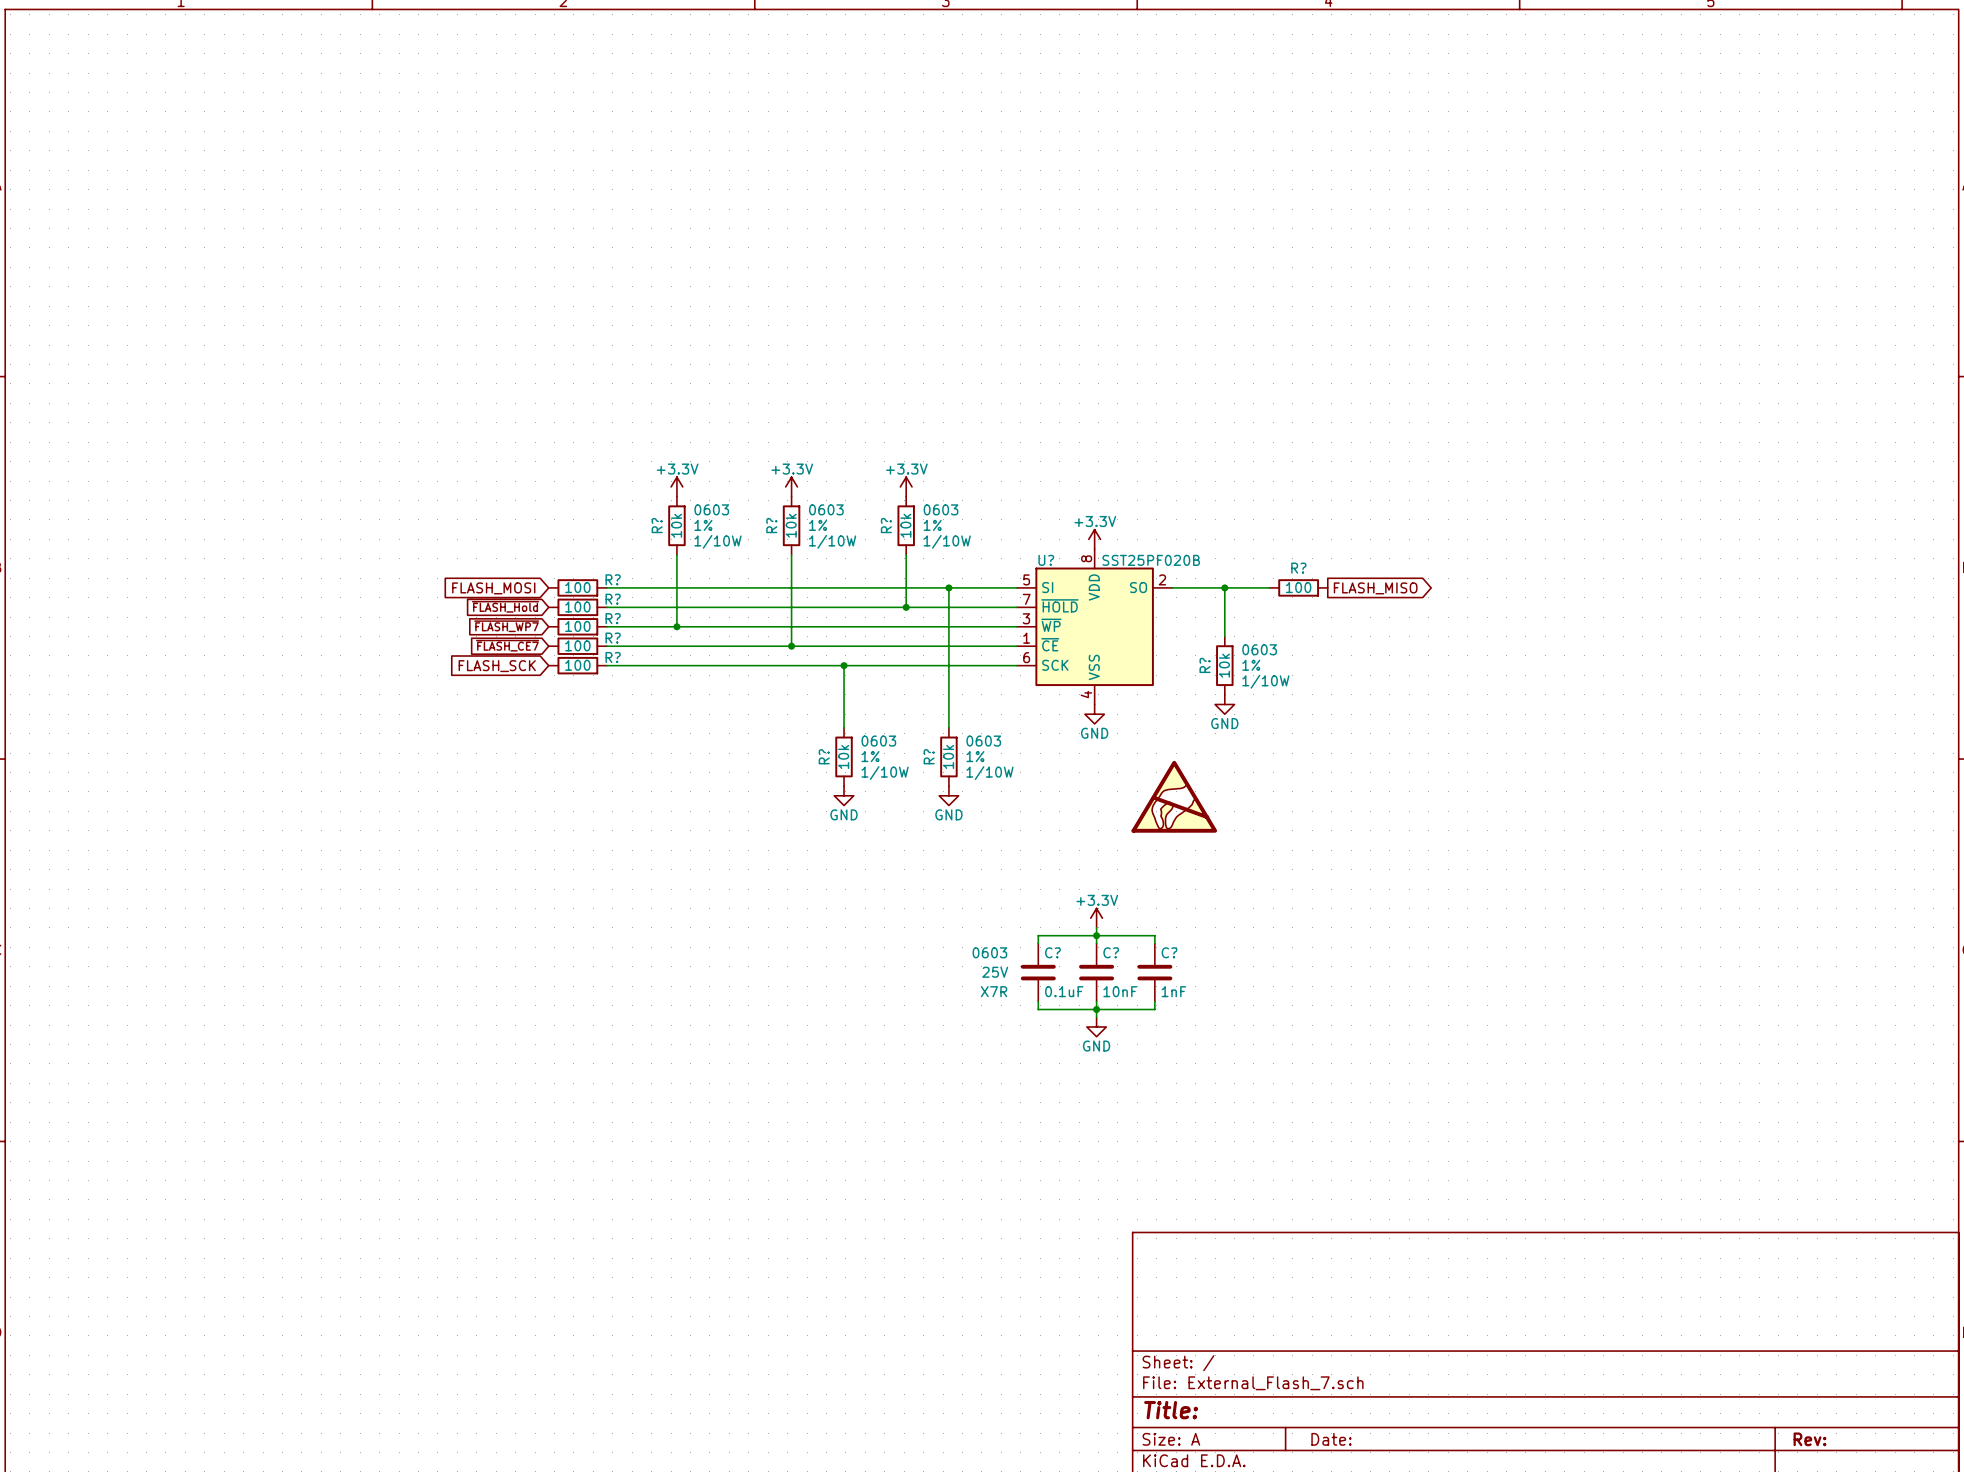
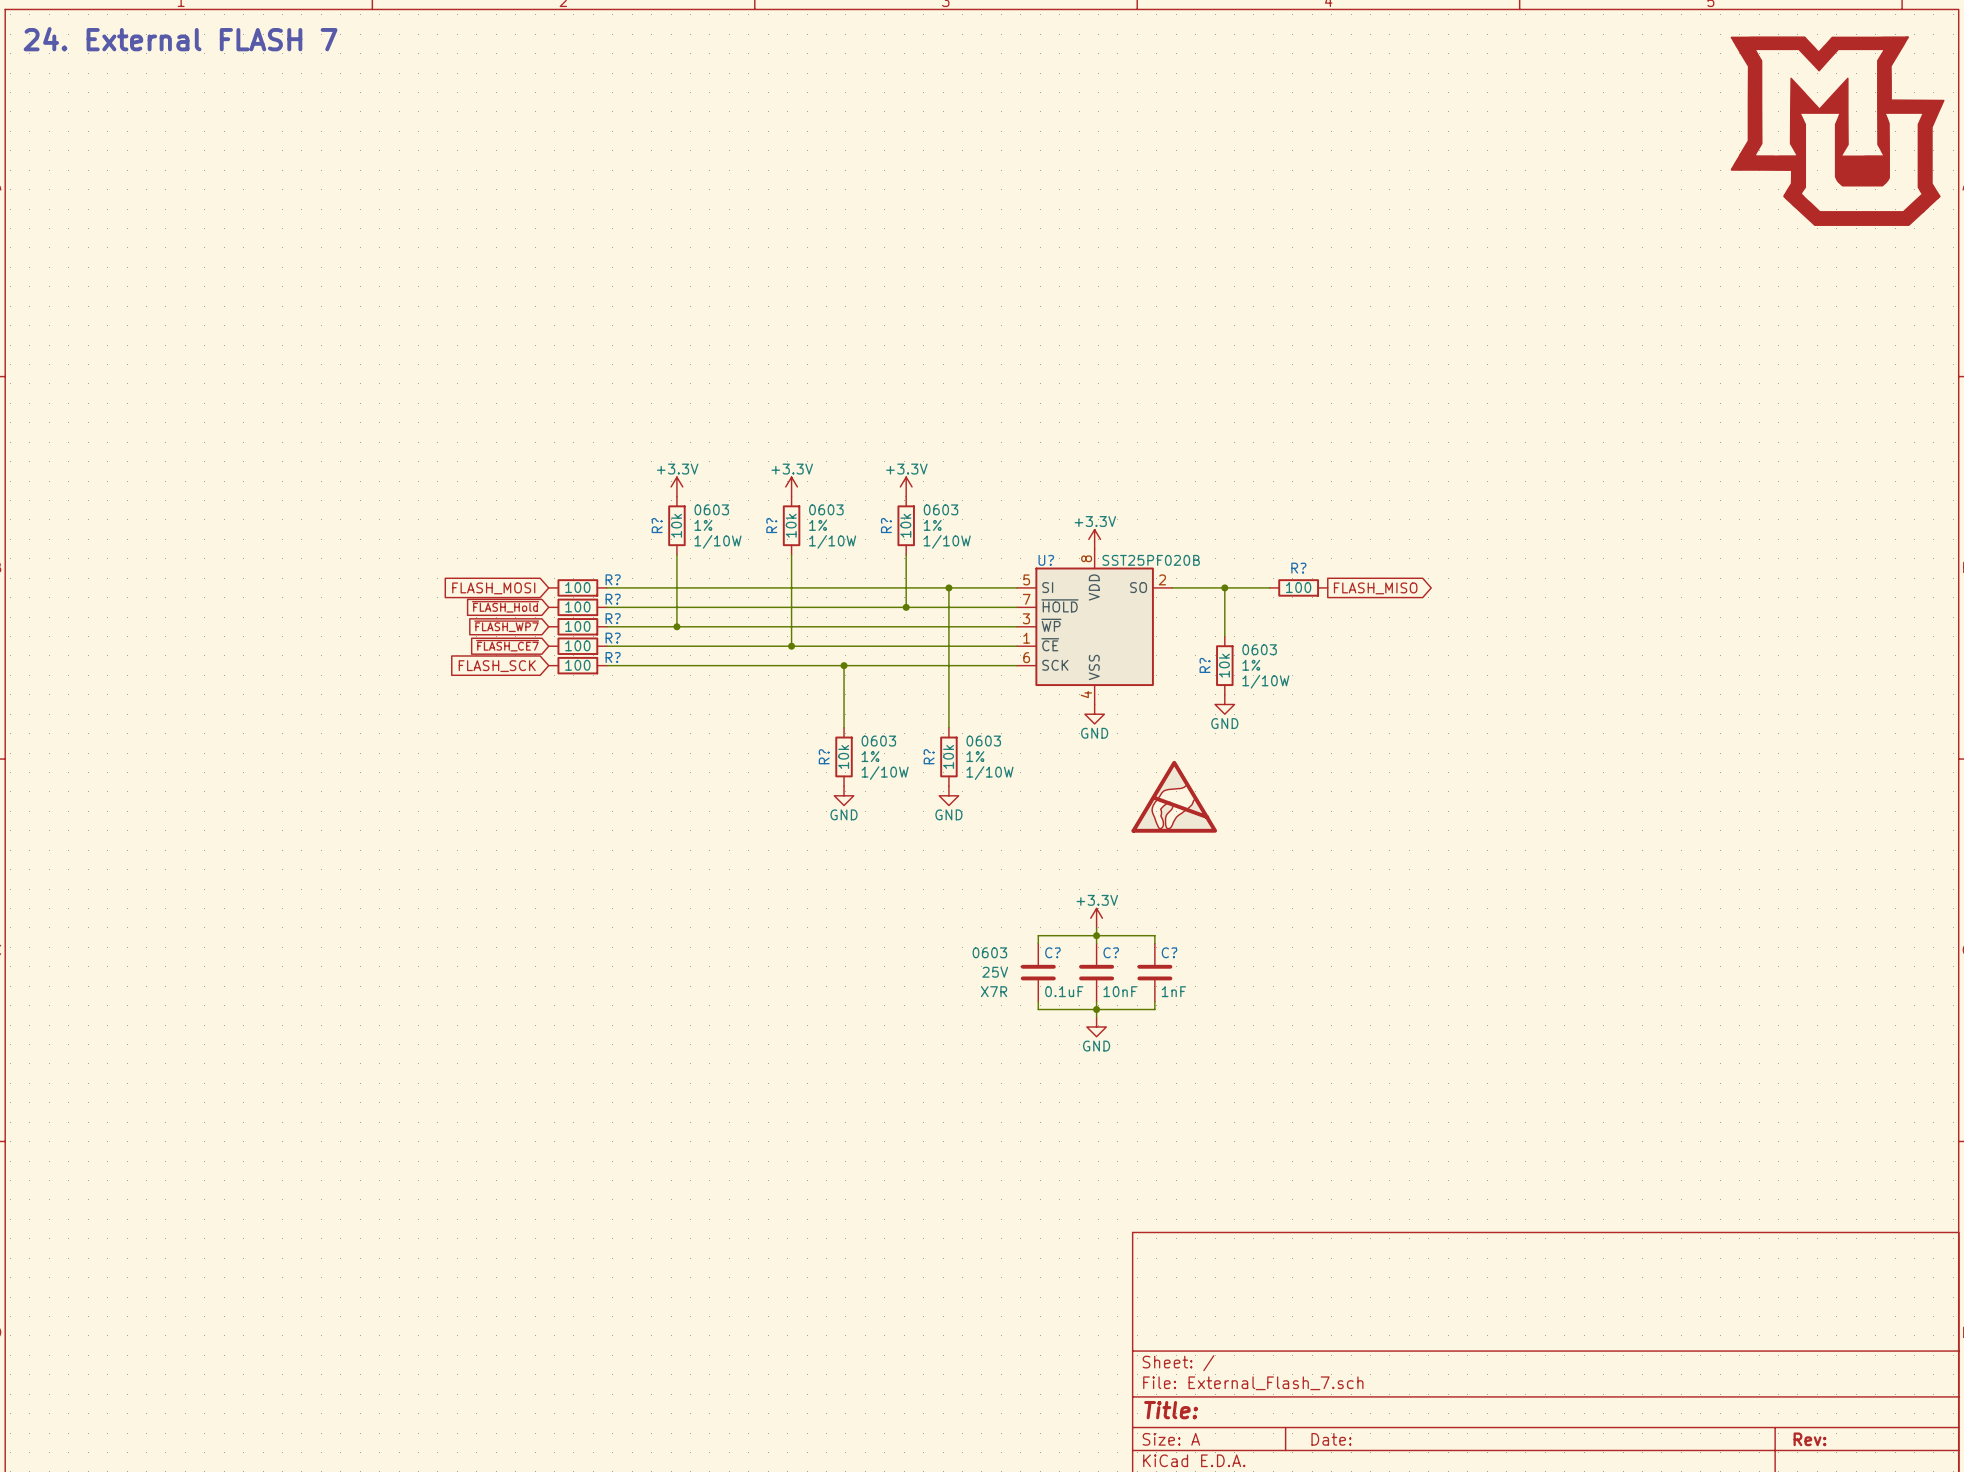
text: none -> 24. External FLASH 7 (180, 39)
power symbol: none -> (1837, 131)

